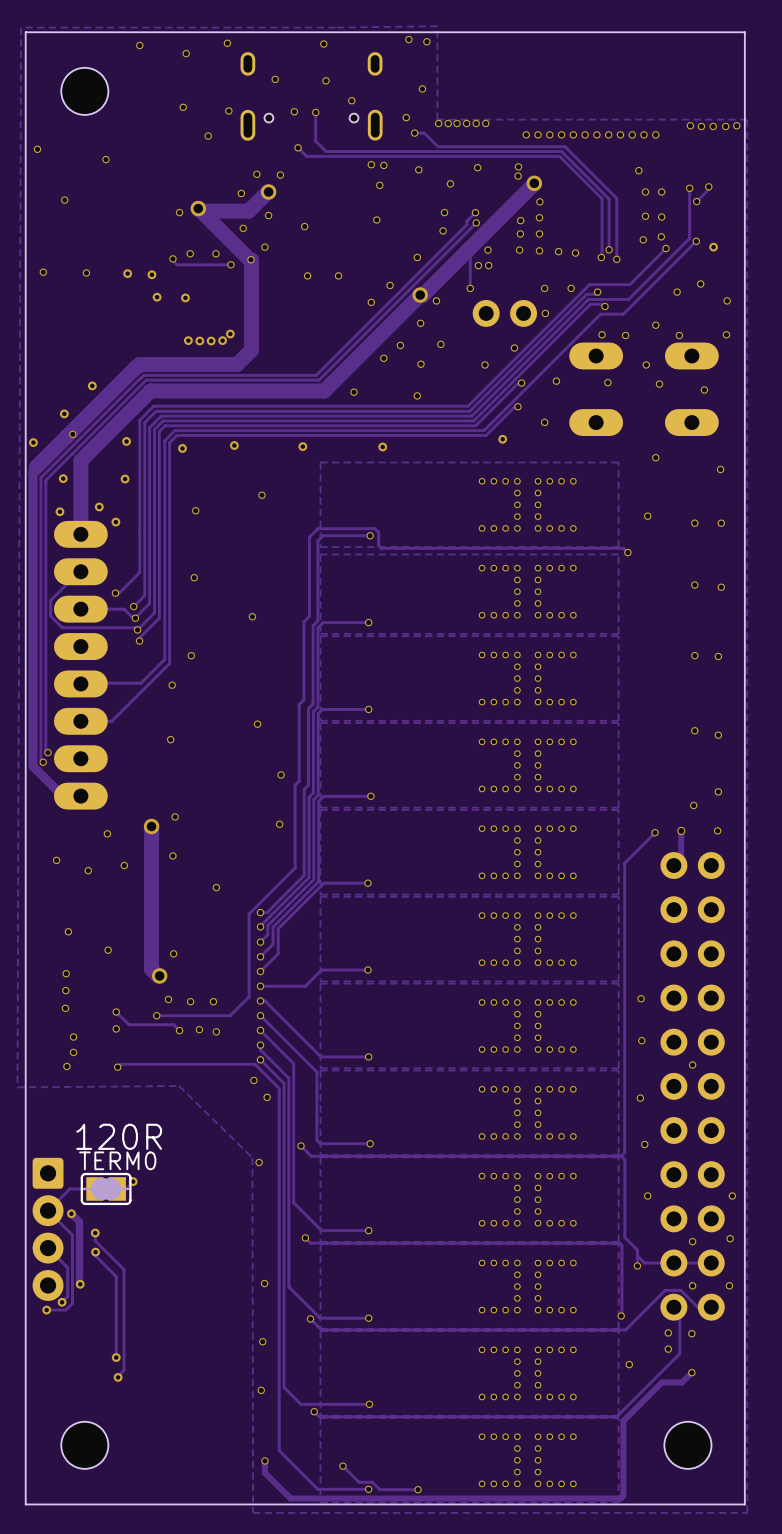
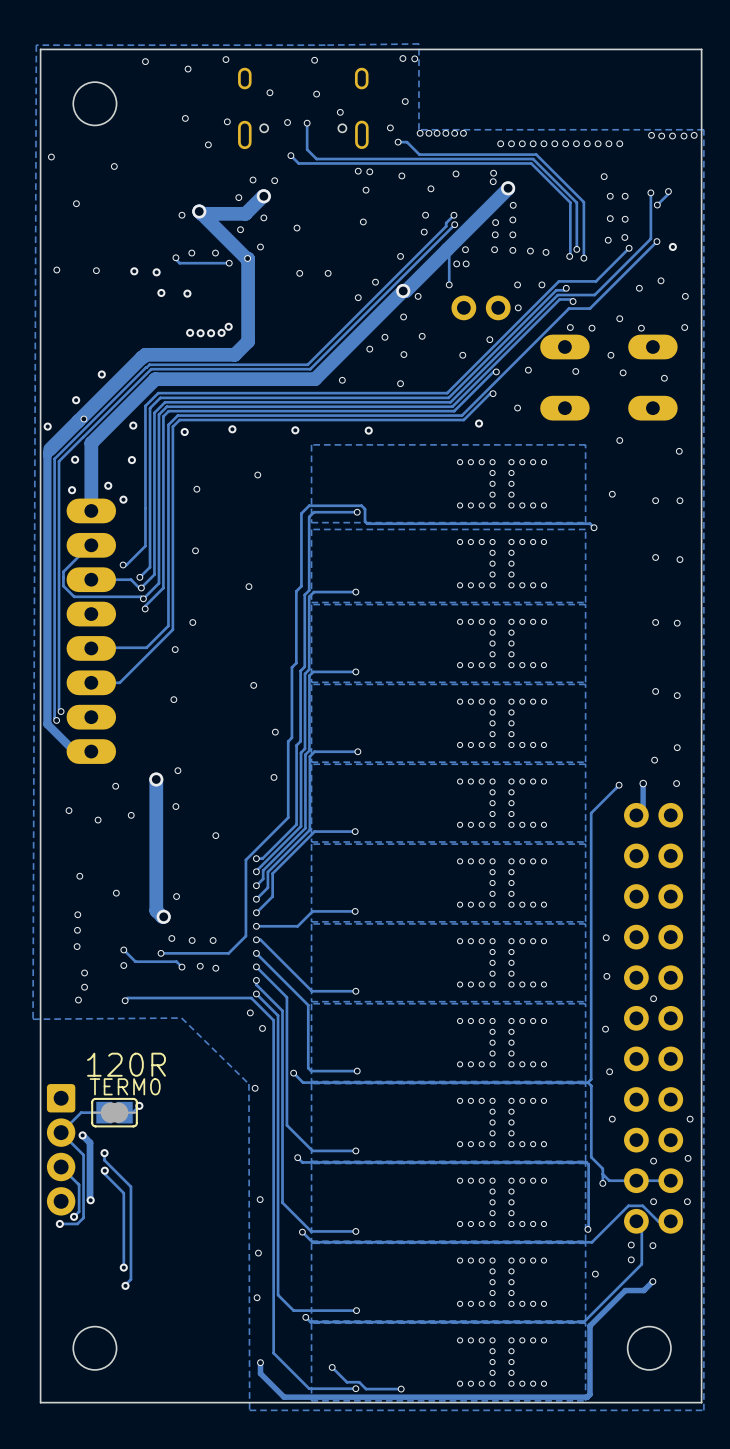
via: (408, 39) -> none
via: (426, 41) -> none
via: none -> (402, 58)
via: none -> (414, 58)

